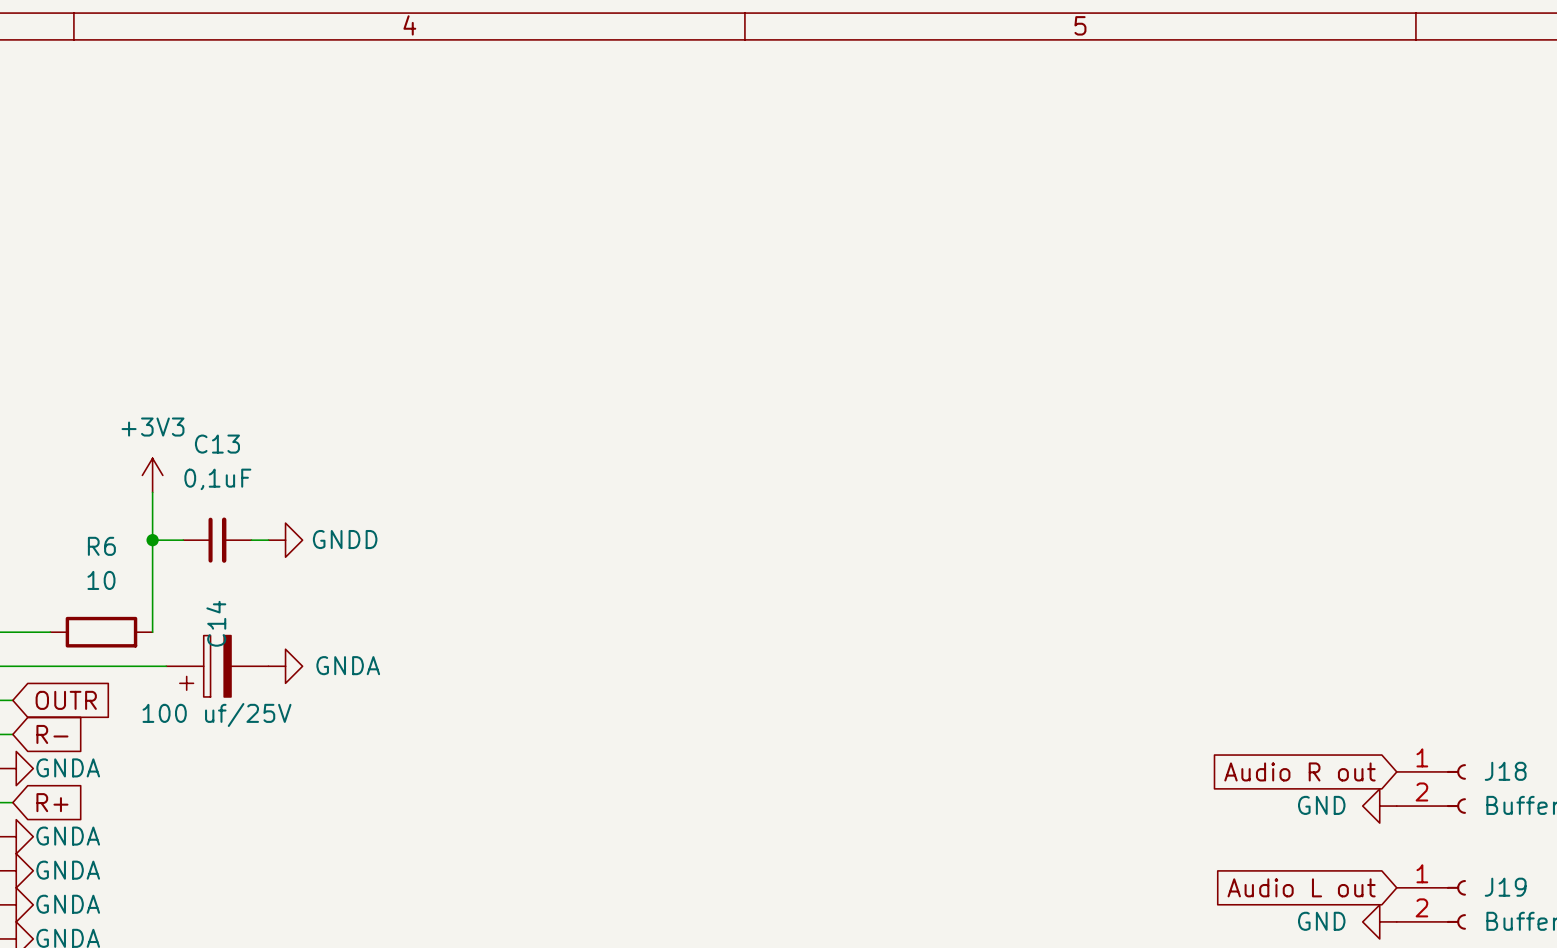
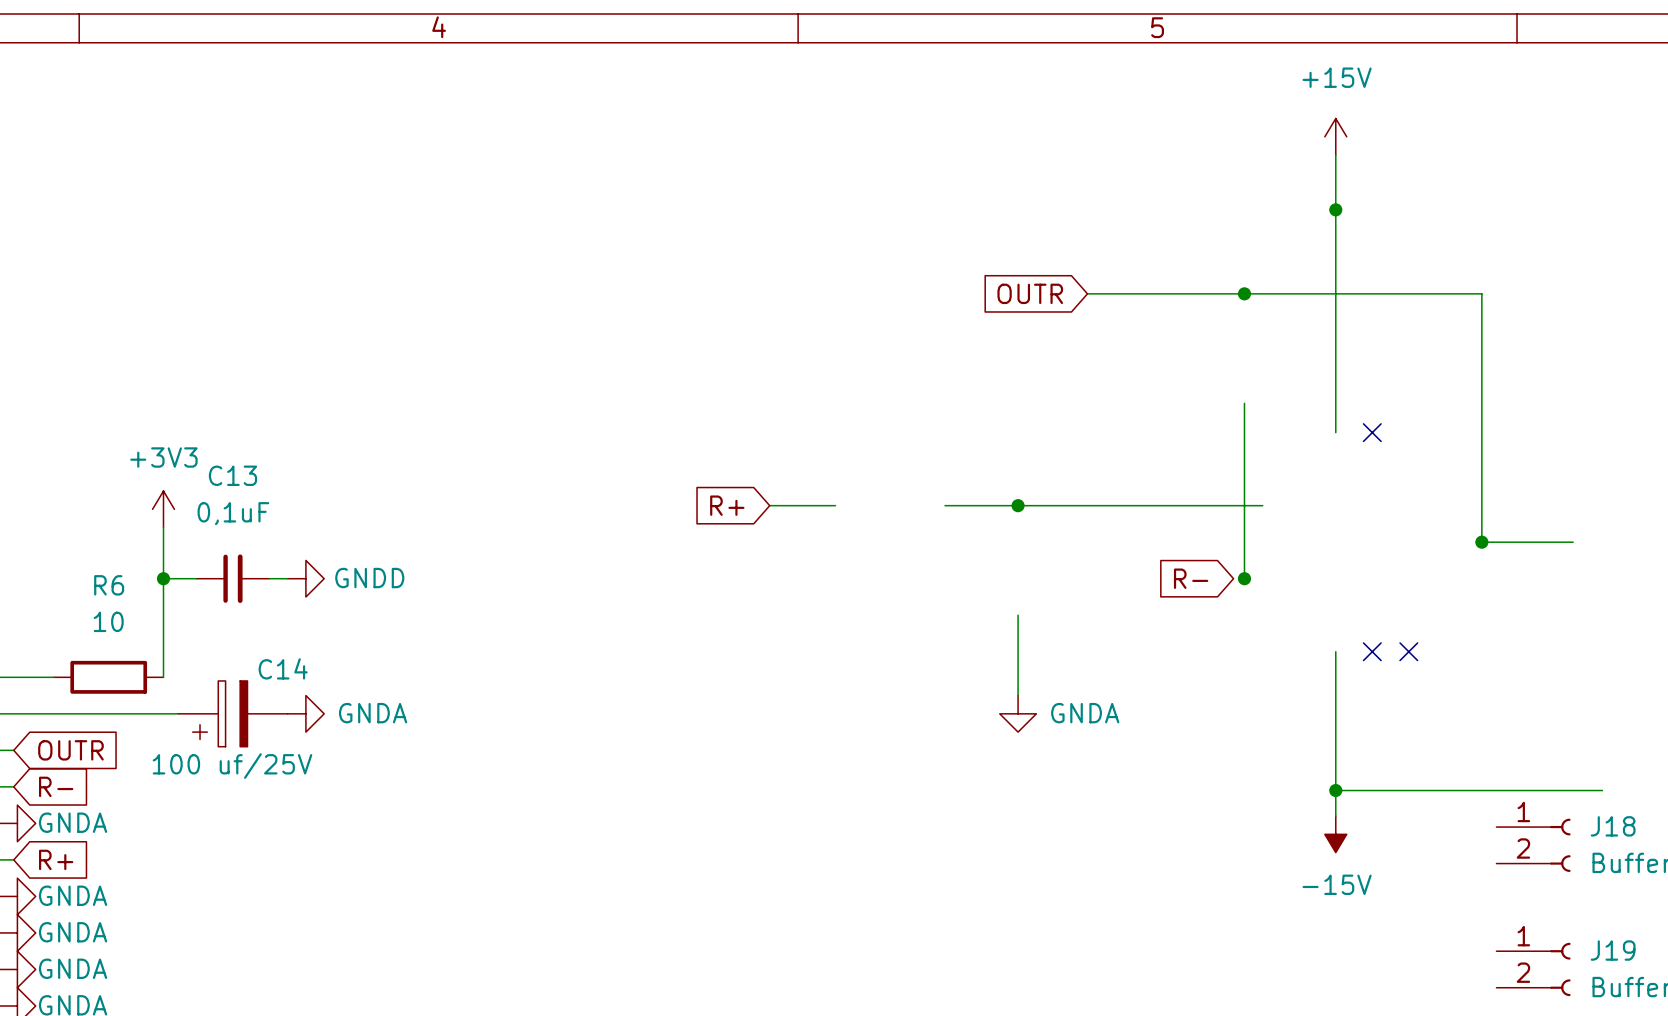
power symbol: none -> +15V (1335, 136)
wire: none -> (1335, 155) (1335, 432)
junction: none -> (1335, 209)
global label: none -> OUTR (1030, 293)
wire: none -> (1087, 293) (1481, 293) (1481, 542) (1573, 542)
junction: none -> (1244, 293)
wire: none -> (1244, 403) (1244, 578)
no-connect mark: none -> (1372, 432)
global label: none -> R+ (727, 505)
wire: none -> (769, 505) (835, 505)
wire: none -> (945, 505) (1262, 505)
junction: none -> (1018, 505)
junction: none -> (1481, 542)
global label: none -> R- (1191, 578)
junction: none -> (1244, 578)
wire: none -> (1018, 615) (1018, 695)
wire: none -> (1335, 651) (1335, 816)
no-connect mark: none -> (1372, 651)
no-connect mark: none -> (1408, 651)
C14 name rotation: 0° (216, 623) -> 90° clockwise (283, 668)
power symbol: none -> GNDA (1018, 713)
wire: none -> (1335, 790) (1602, 790)
junction: none -> (1335, 790)
global label: Audio R out (1299, 771) -> none
power symbol: none -> -15V (1335, 834)
power symbol: GND (1379, 806) -> none
global label: Audio L out (1301, 887) -> none
power symbol: GND (1379, 921) -> none

